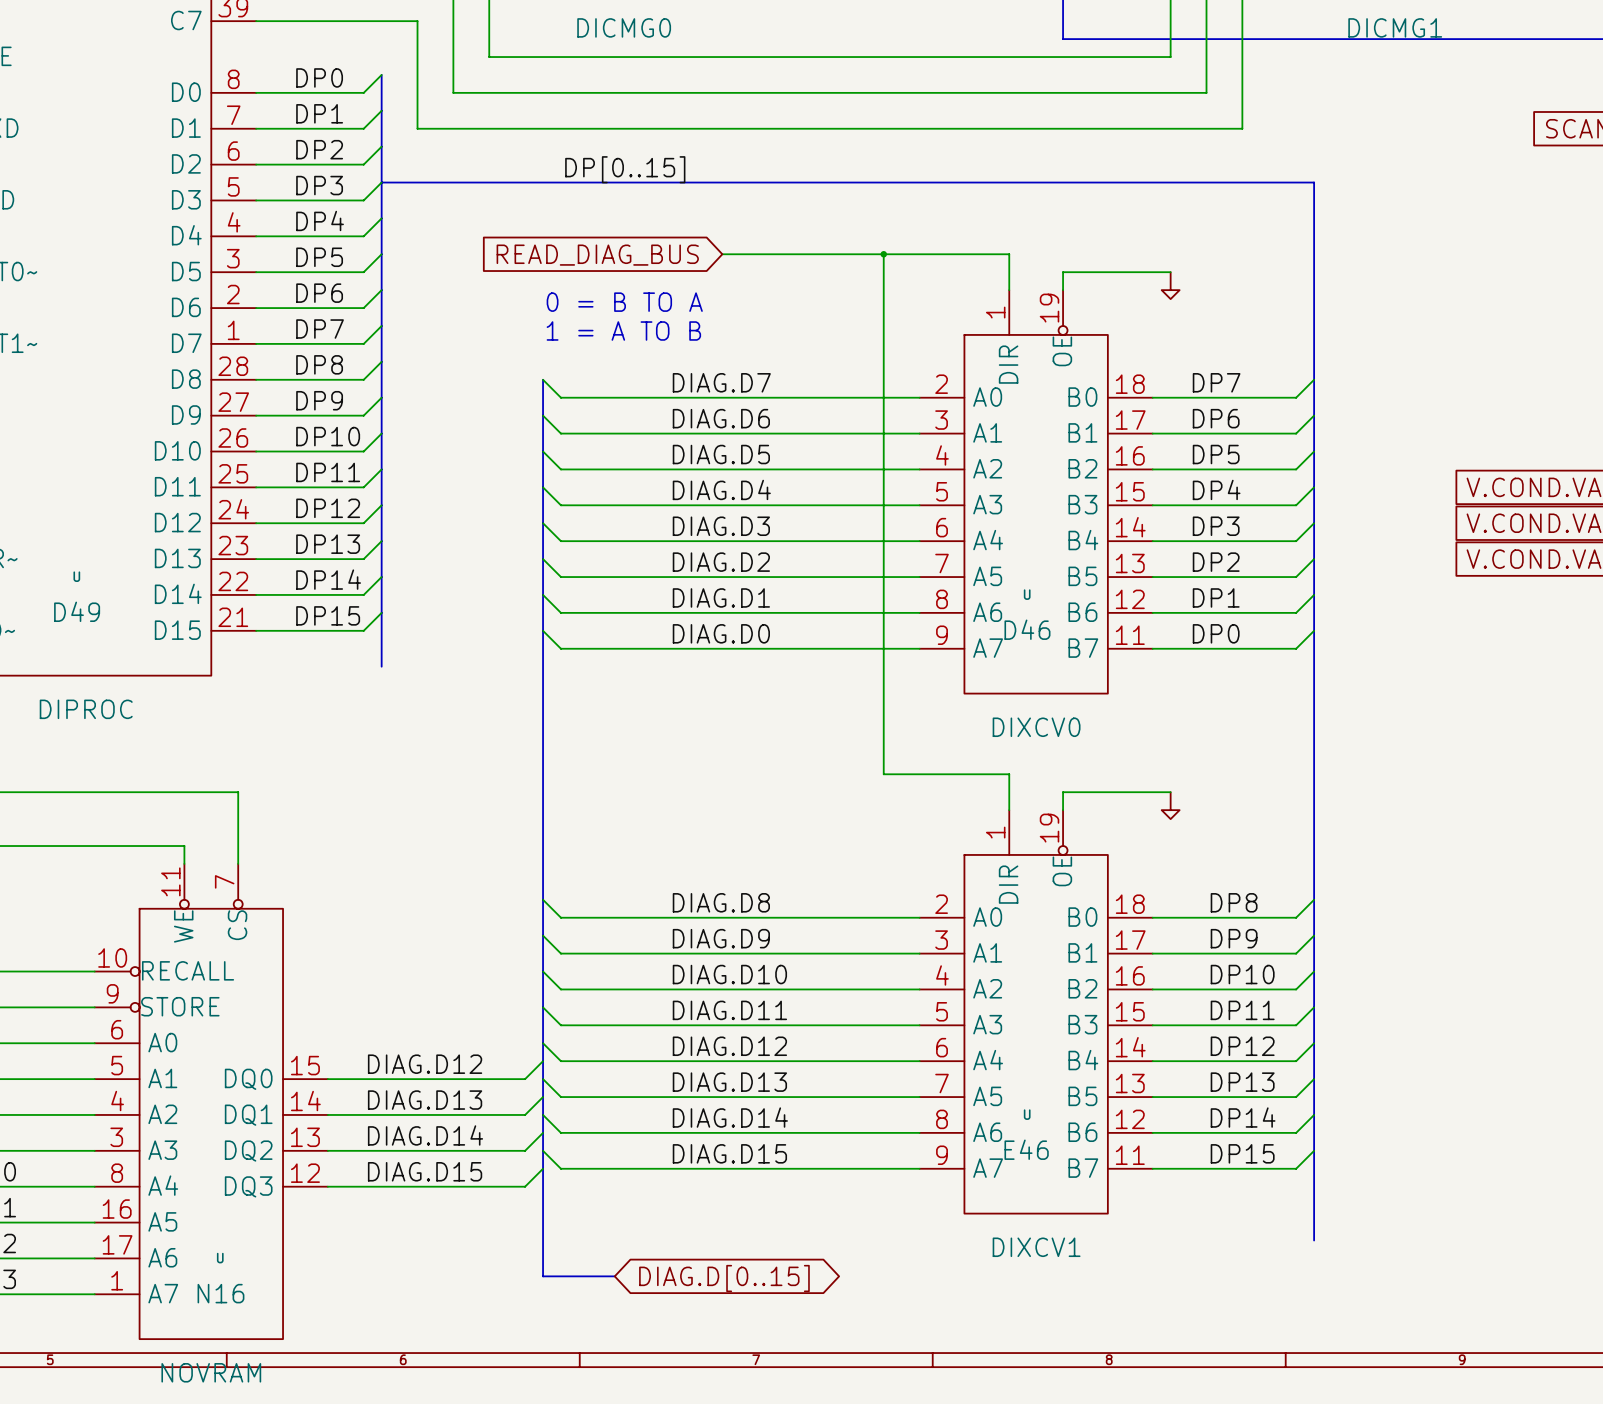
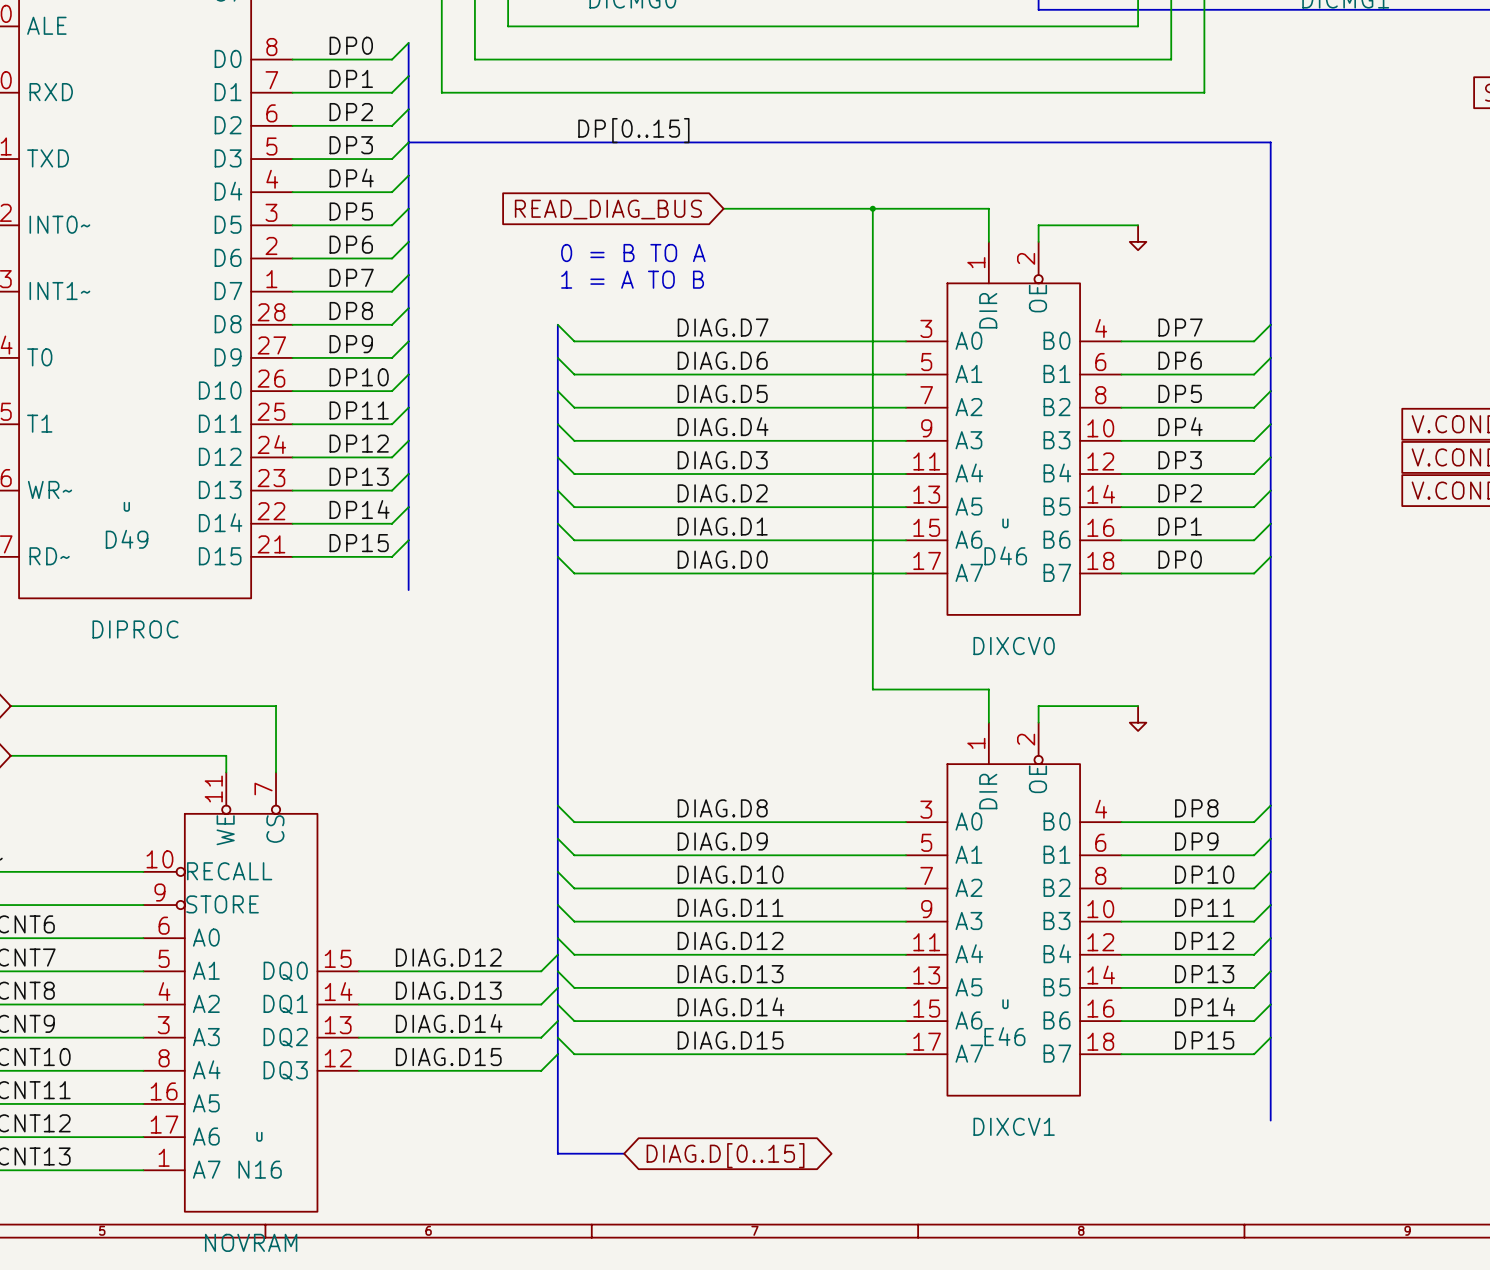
U symbol: [919, 290, 1153, 694] -> [905, 241, 1122, 615]
U symbol: [919, 810, 1153, 1214] -> [905, 722, 1122, 1096]

